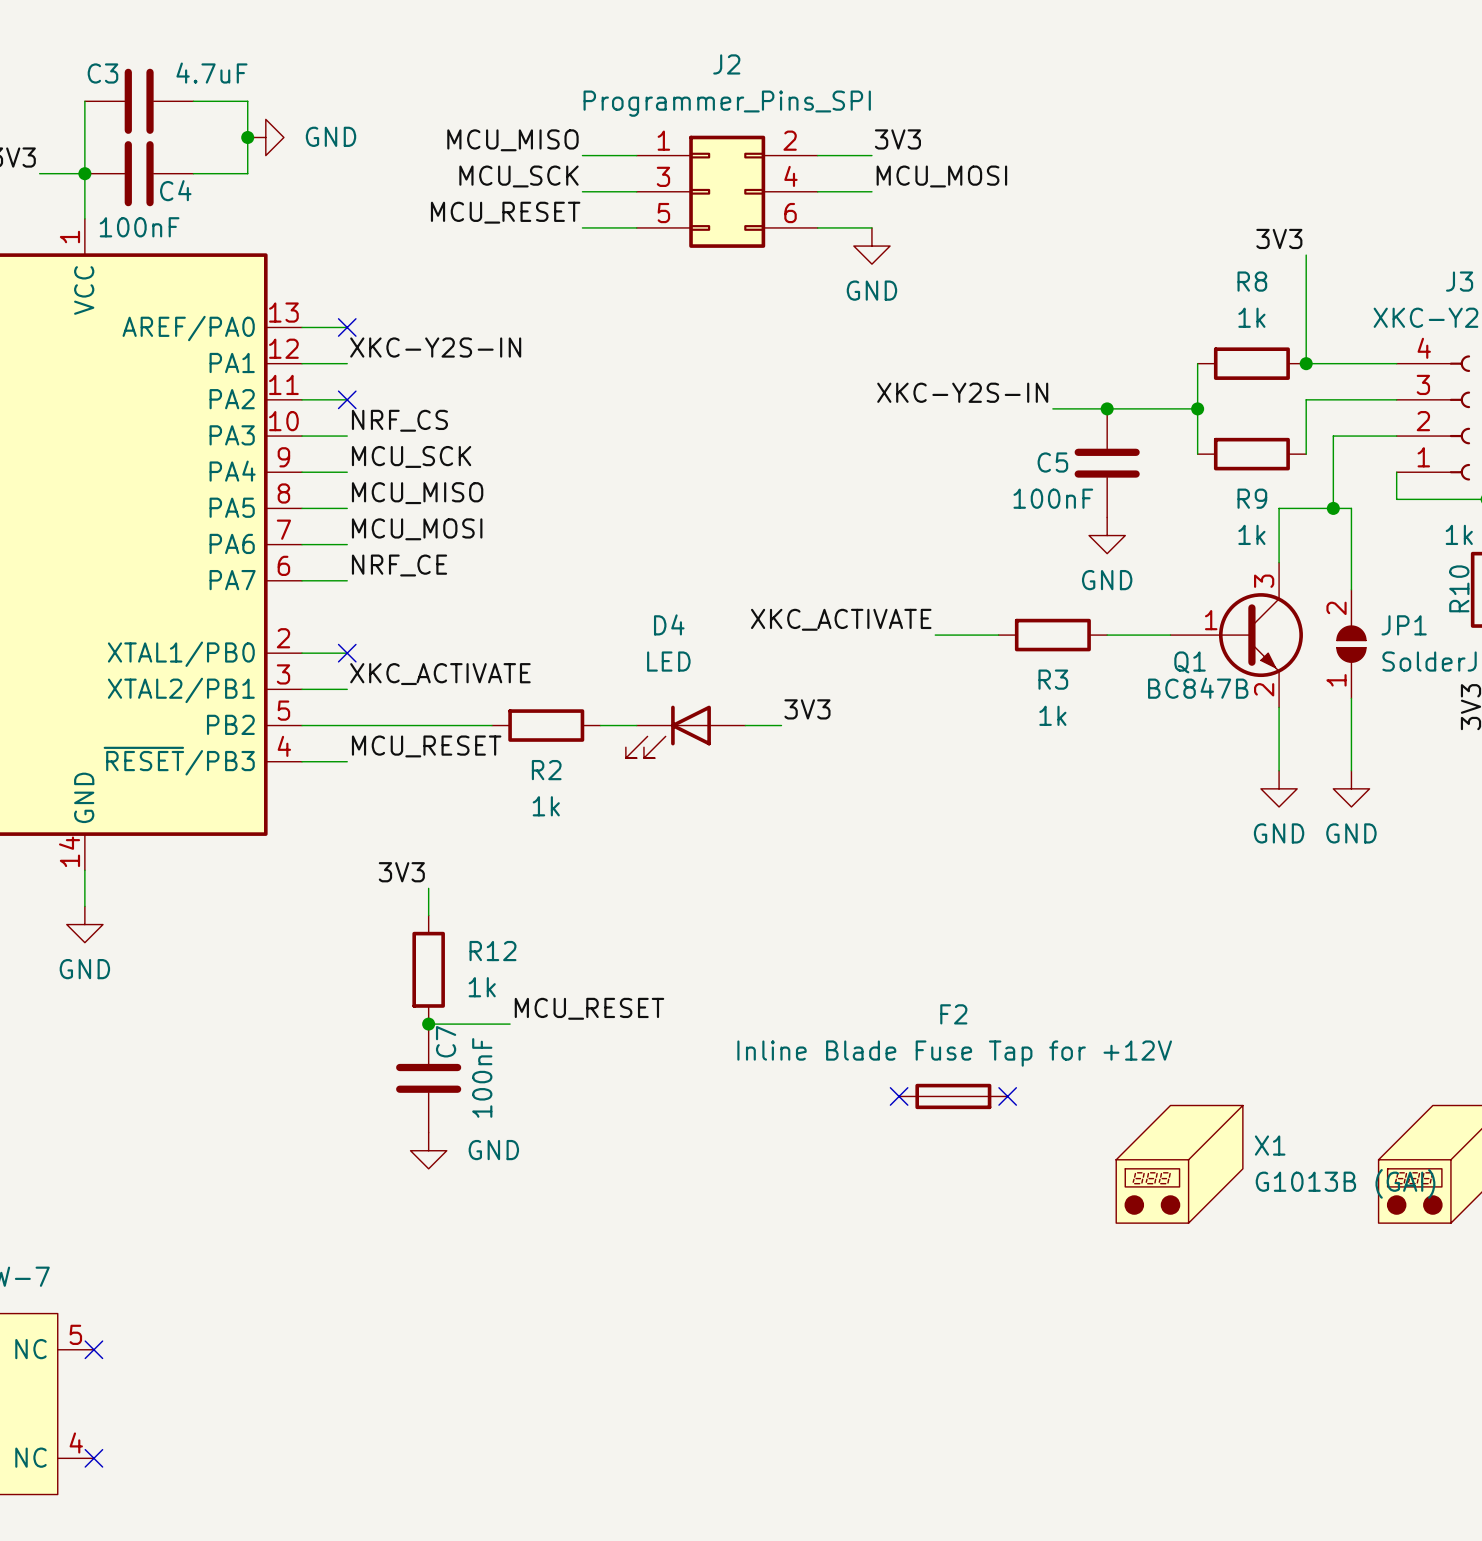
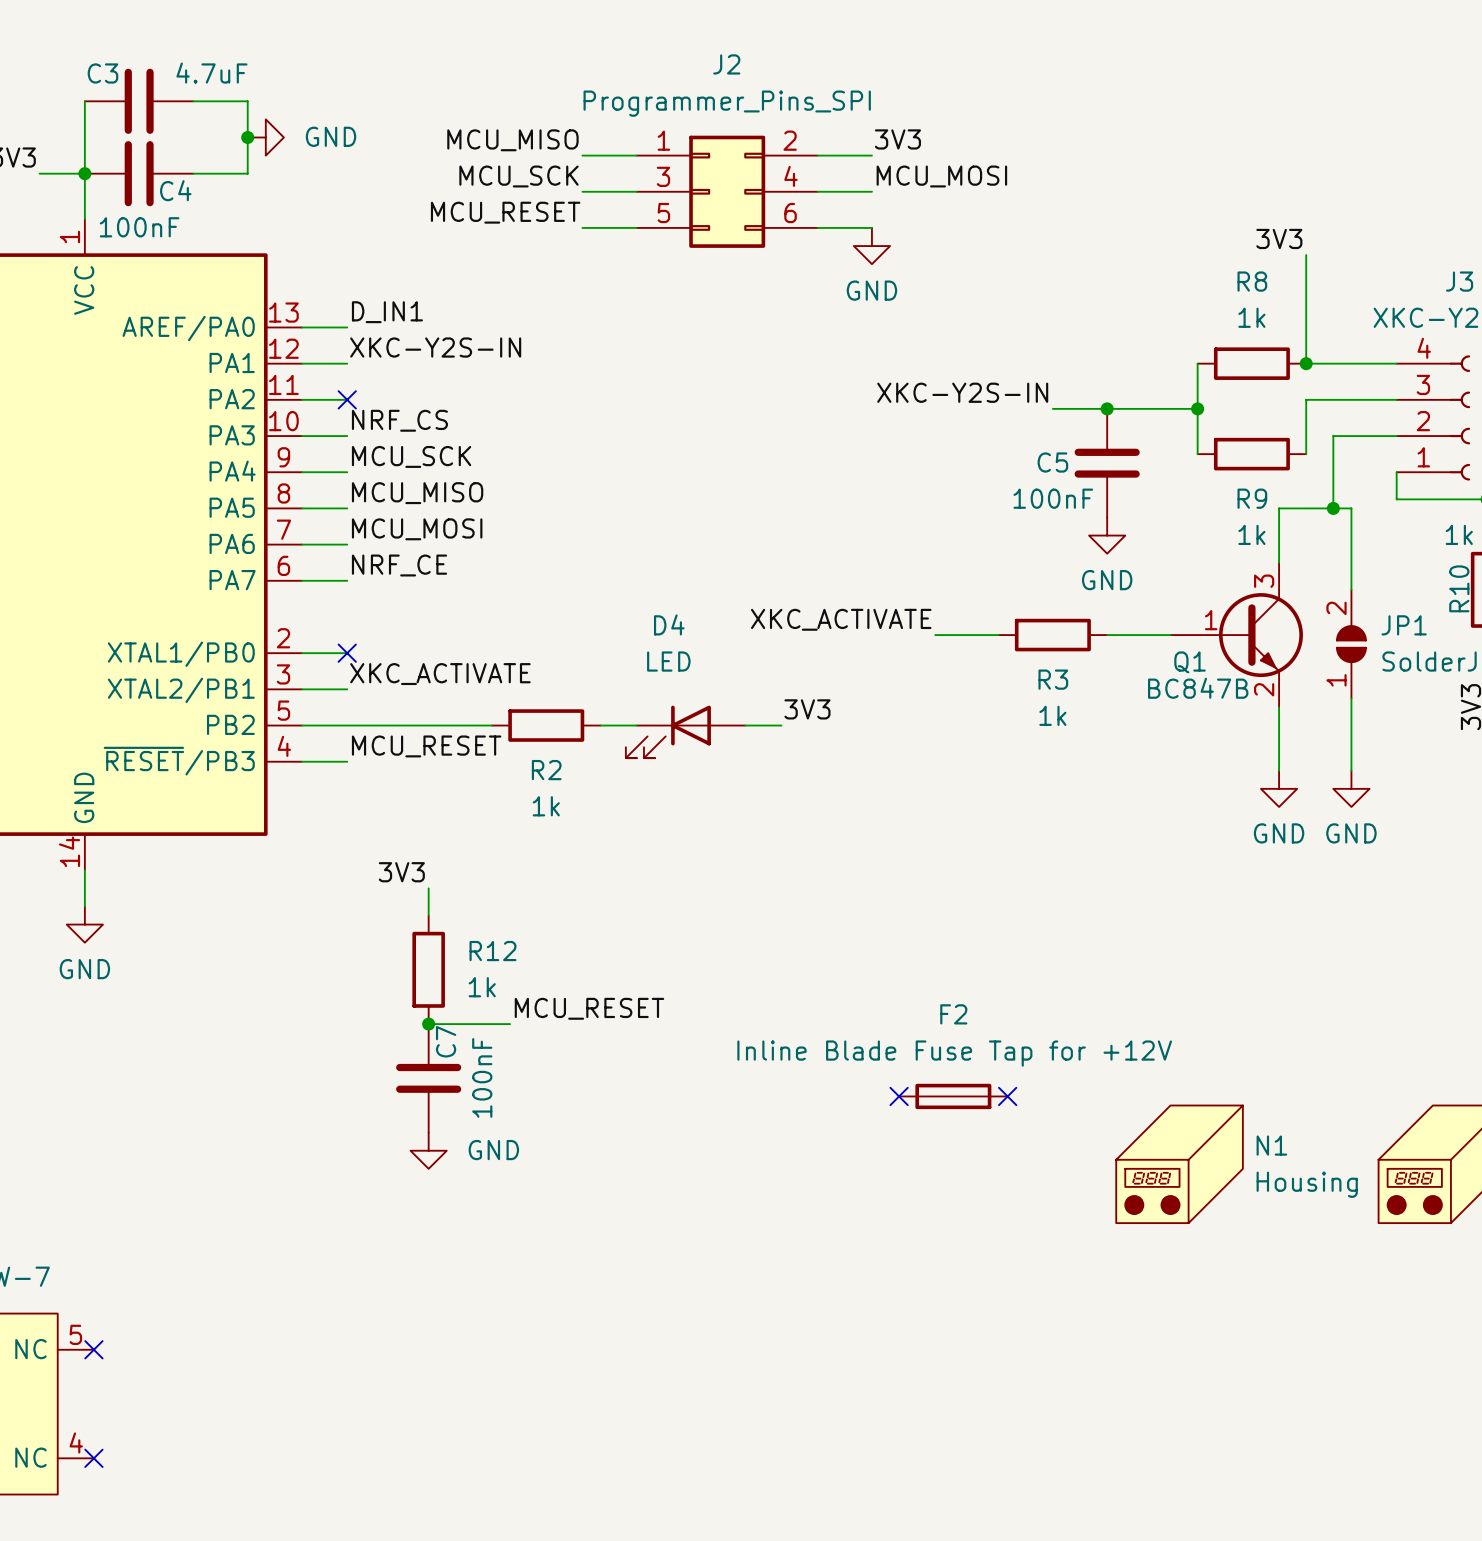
label: none -> D_IN1 (387, 312)
no-connect mark: (347, 327) -> none
X1 name: X1 (1270, 1145) -> N1 (1271, 1145)
X1 value: G1013B (GAI) (1345, 1183) -> Housing (1307, 1184)

